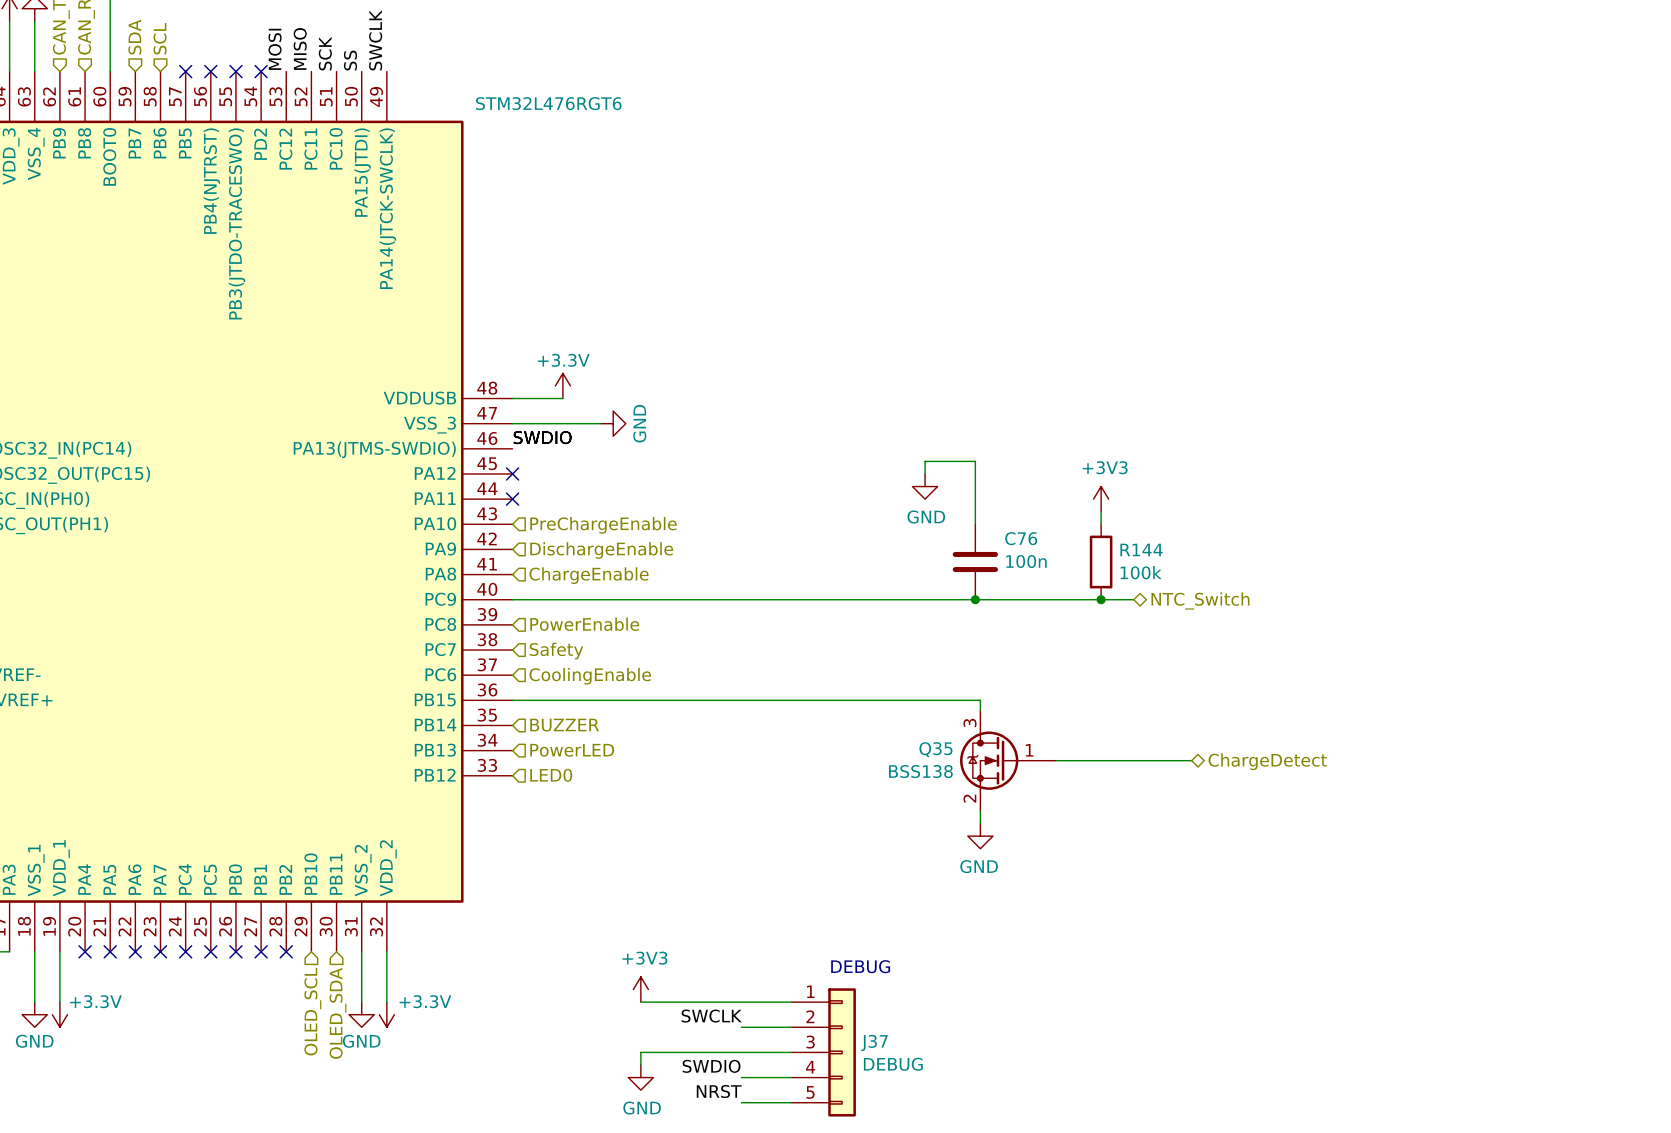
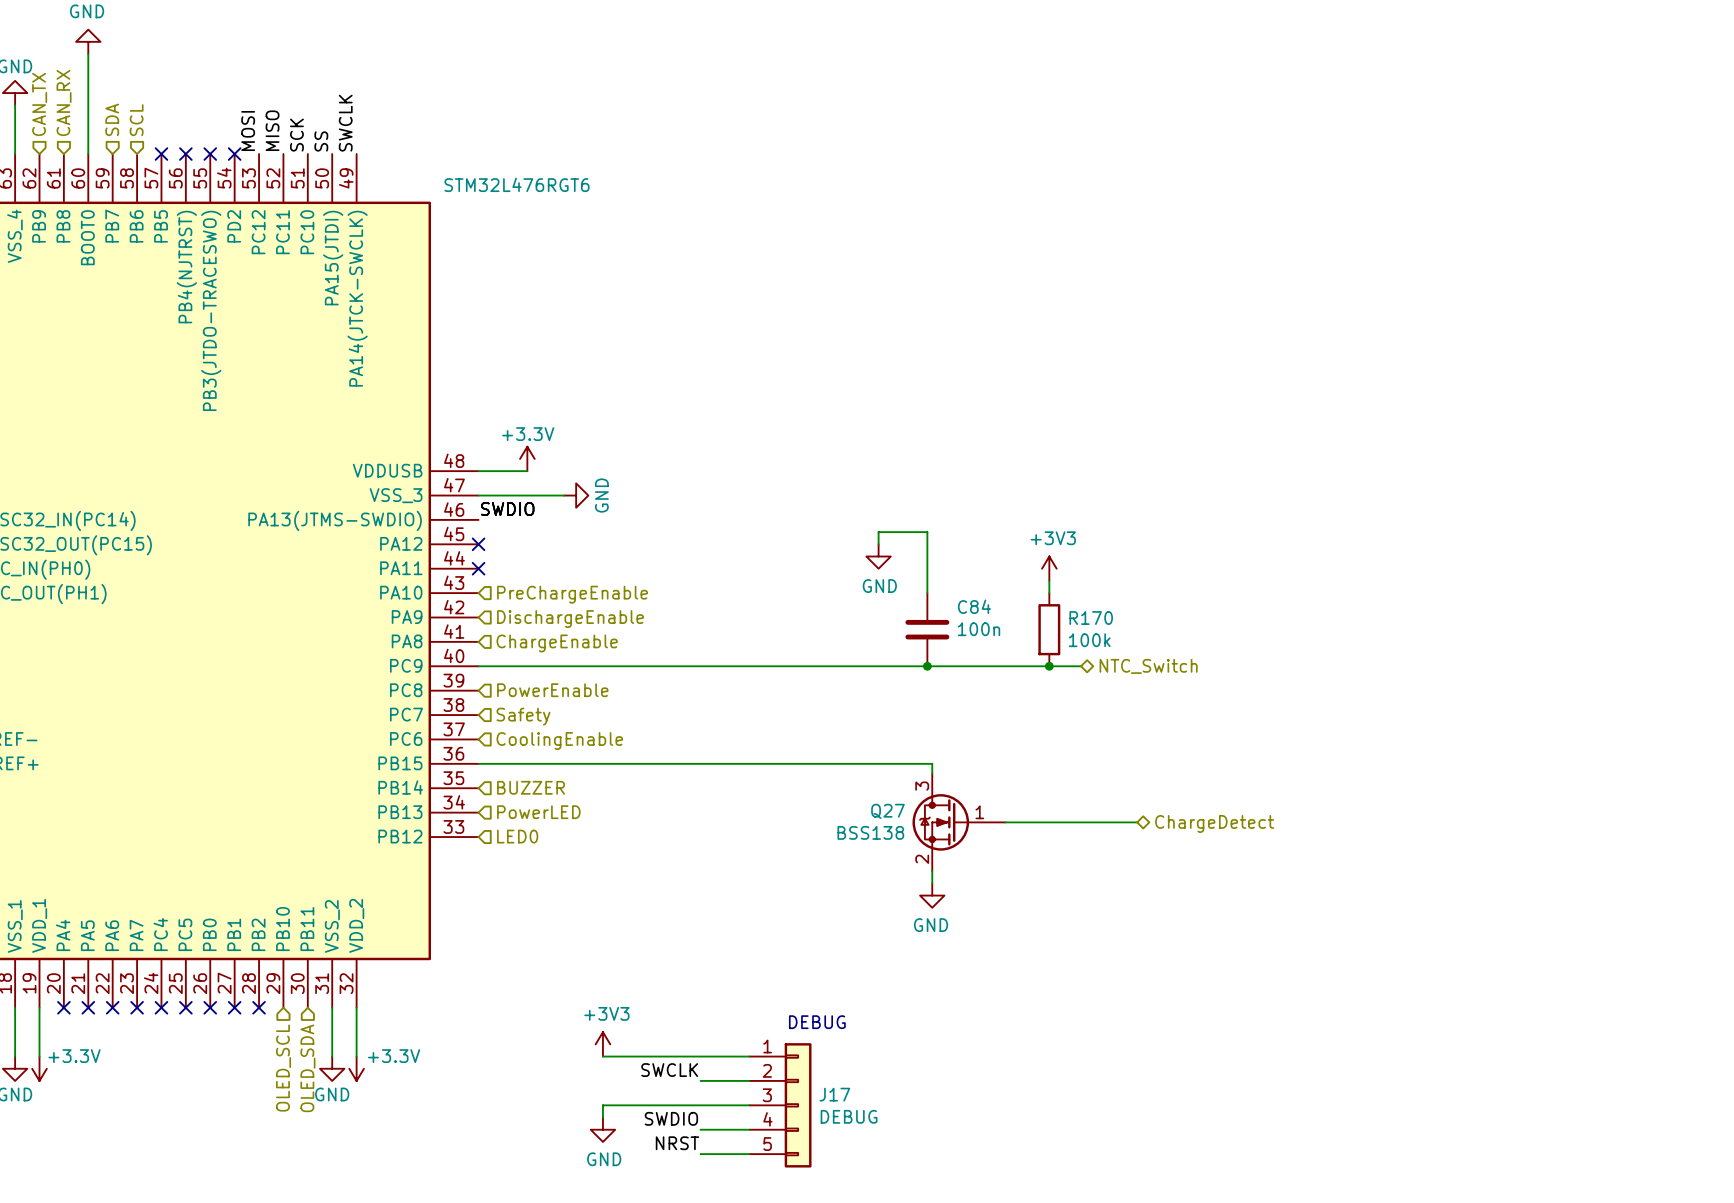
C76 name: C76 (1021, 538) -> C84 (974, 606)
R144 name: R144 (1141, 549) -> R170 (1091, 618)
Q35 name: Q35 (935, 749) -> Q27 (887, 811)
J37 name: J37 (874, 1043) -> J17 (834, 1094)

